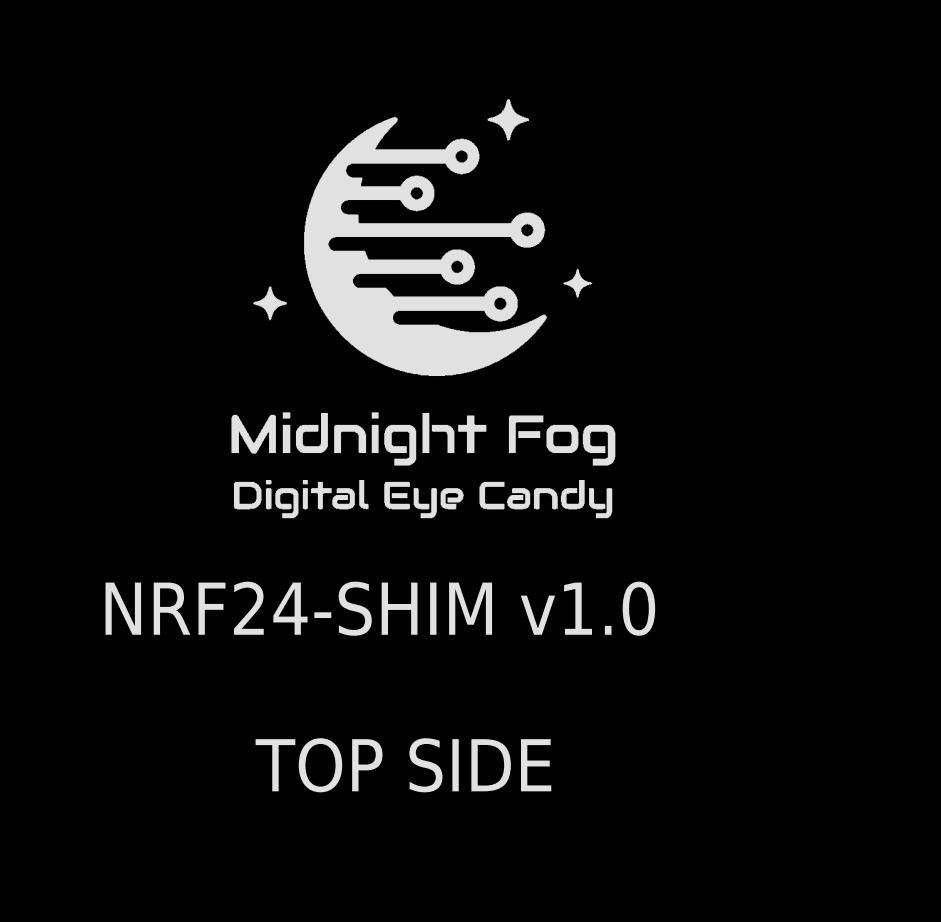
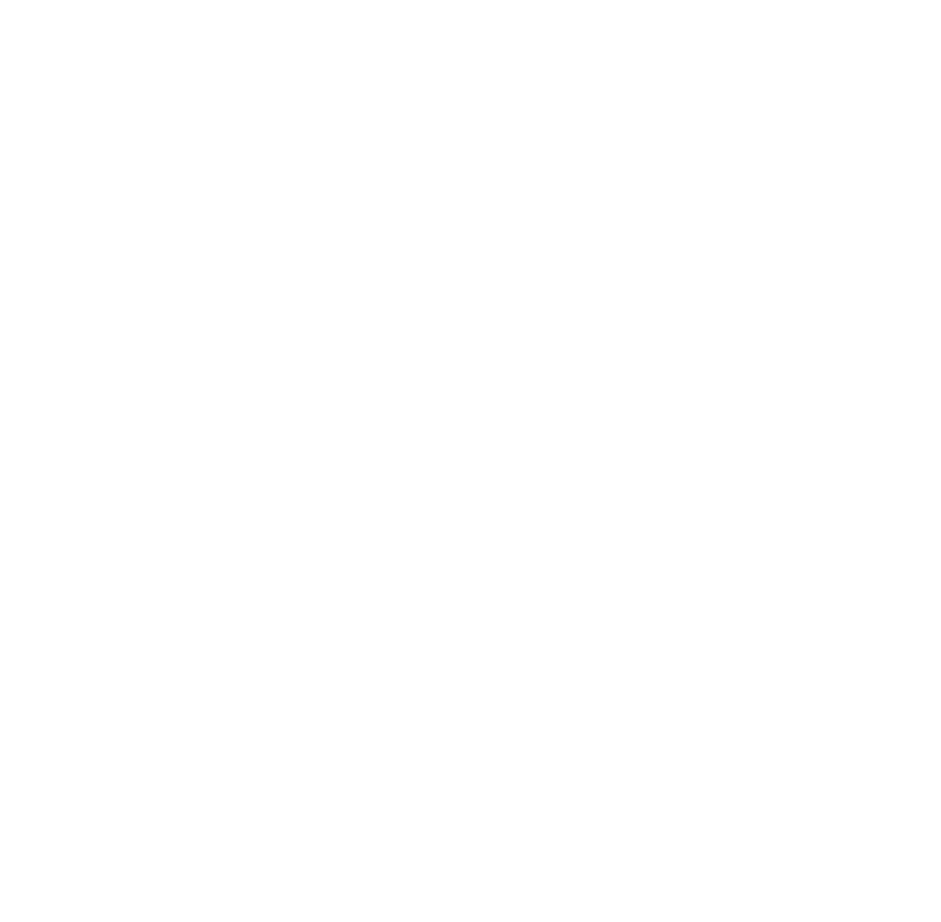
drawing: [231, 99, 616, 519] -> none
text: NRF24-SHIM v1.0 (380, 608) -> none
text: TOP SIDE (403, 765) -> none

